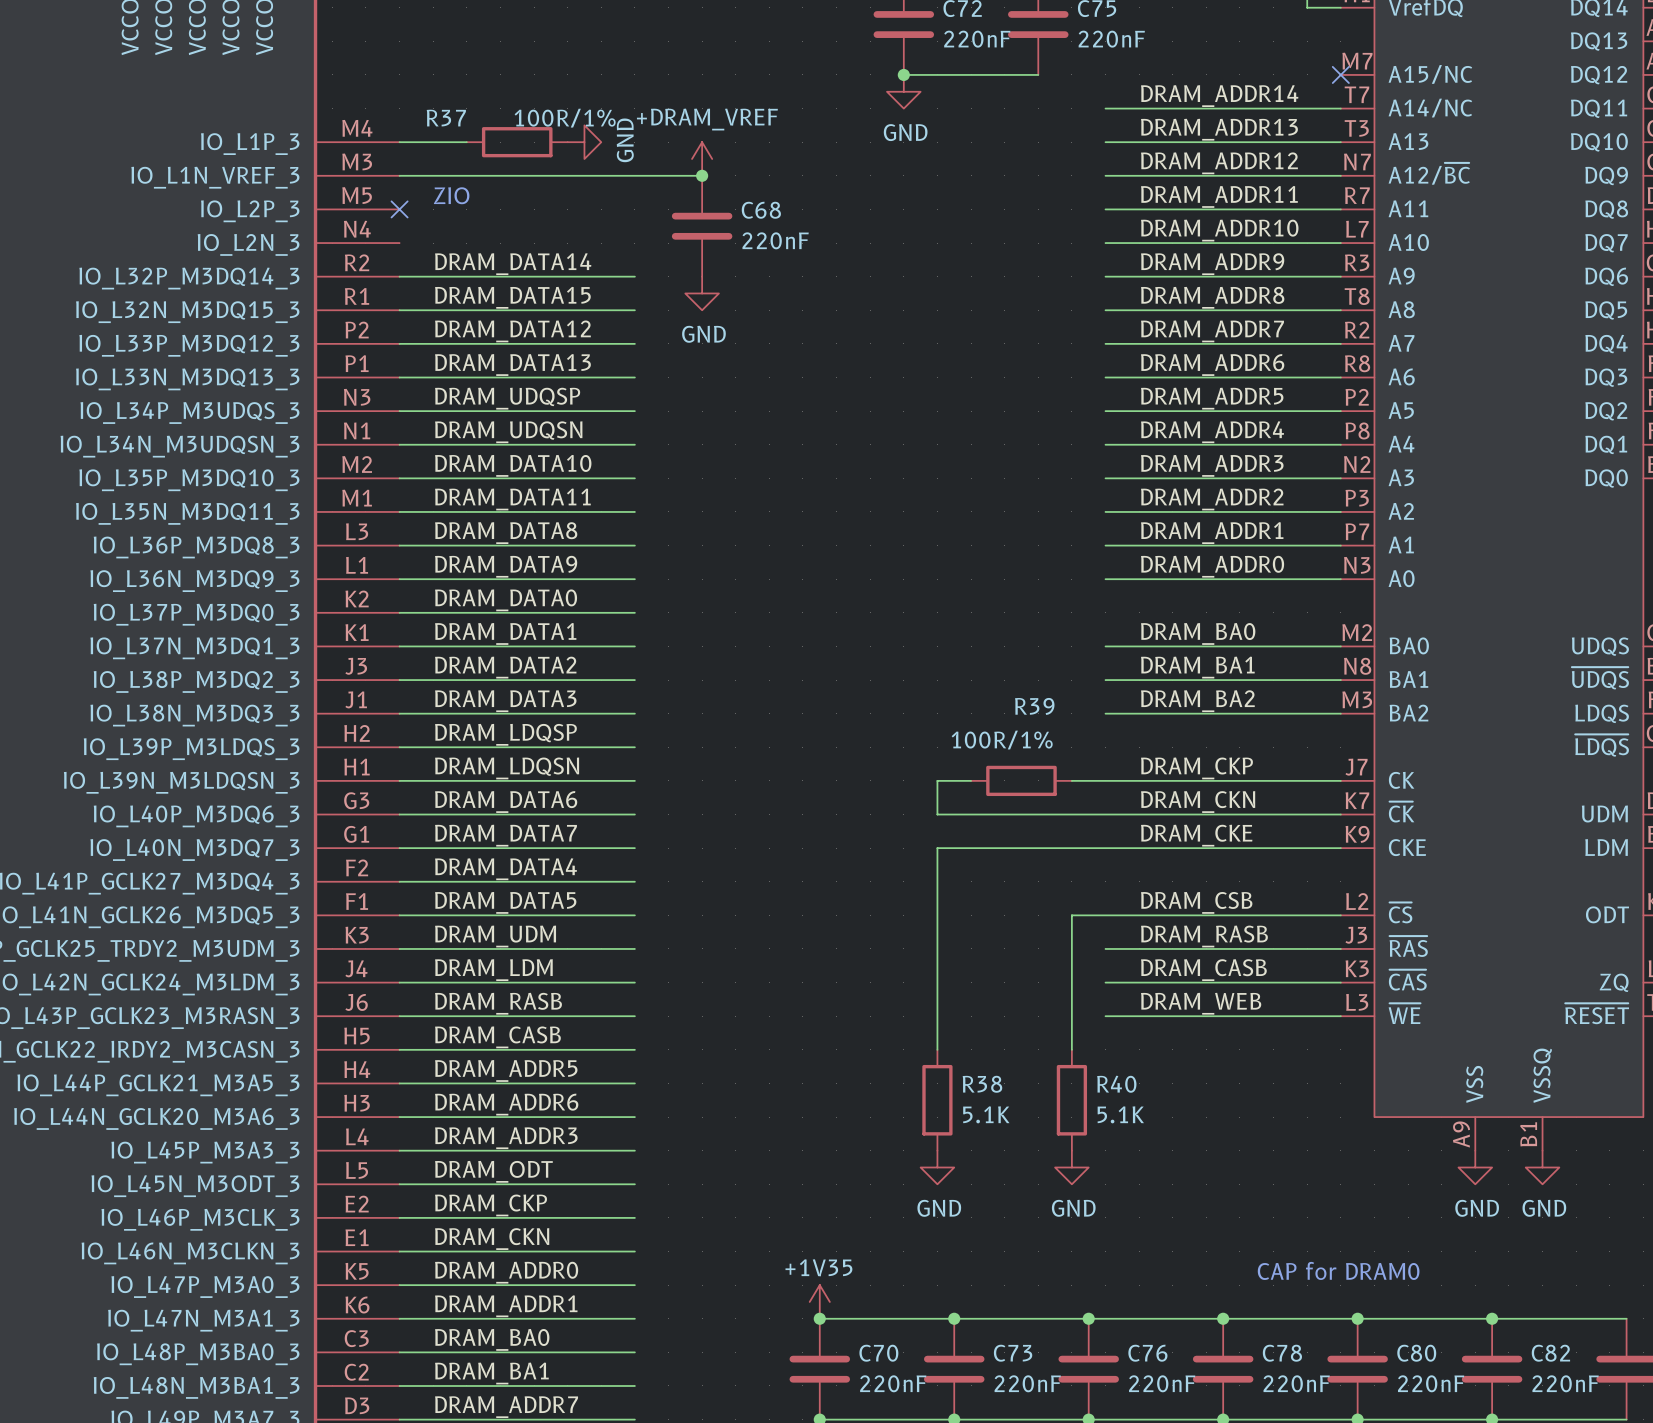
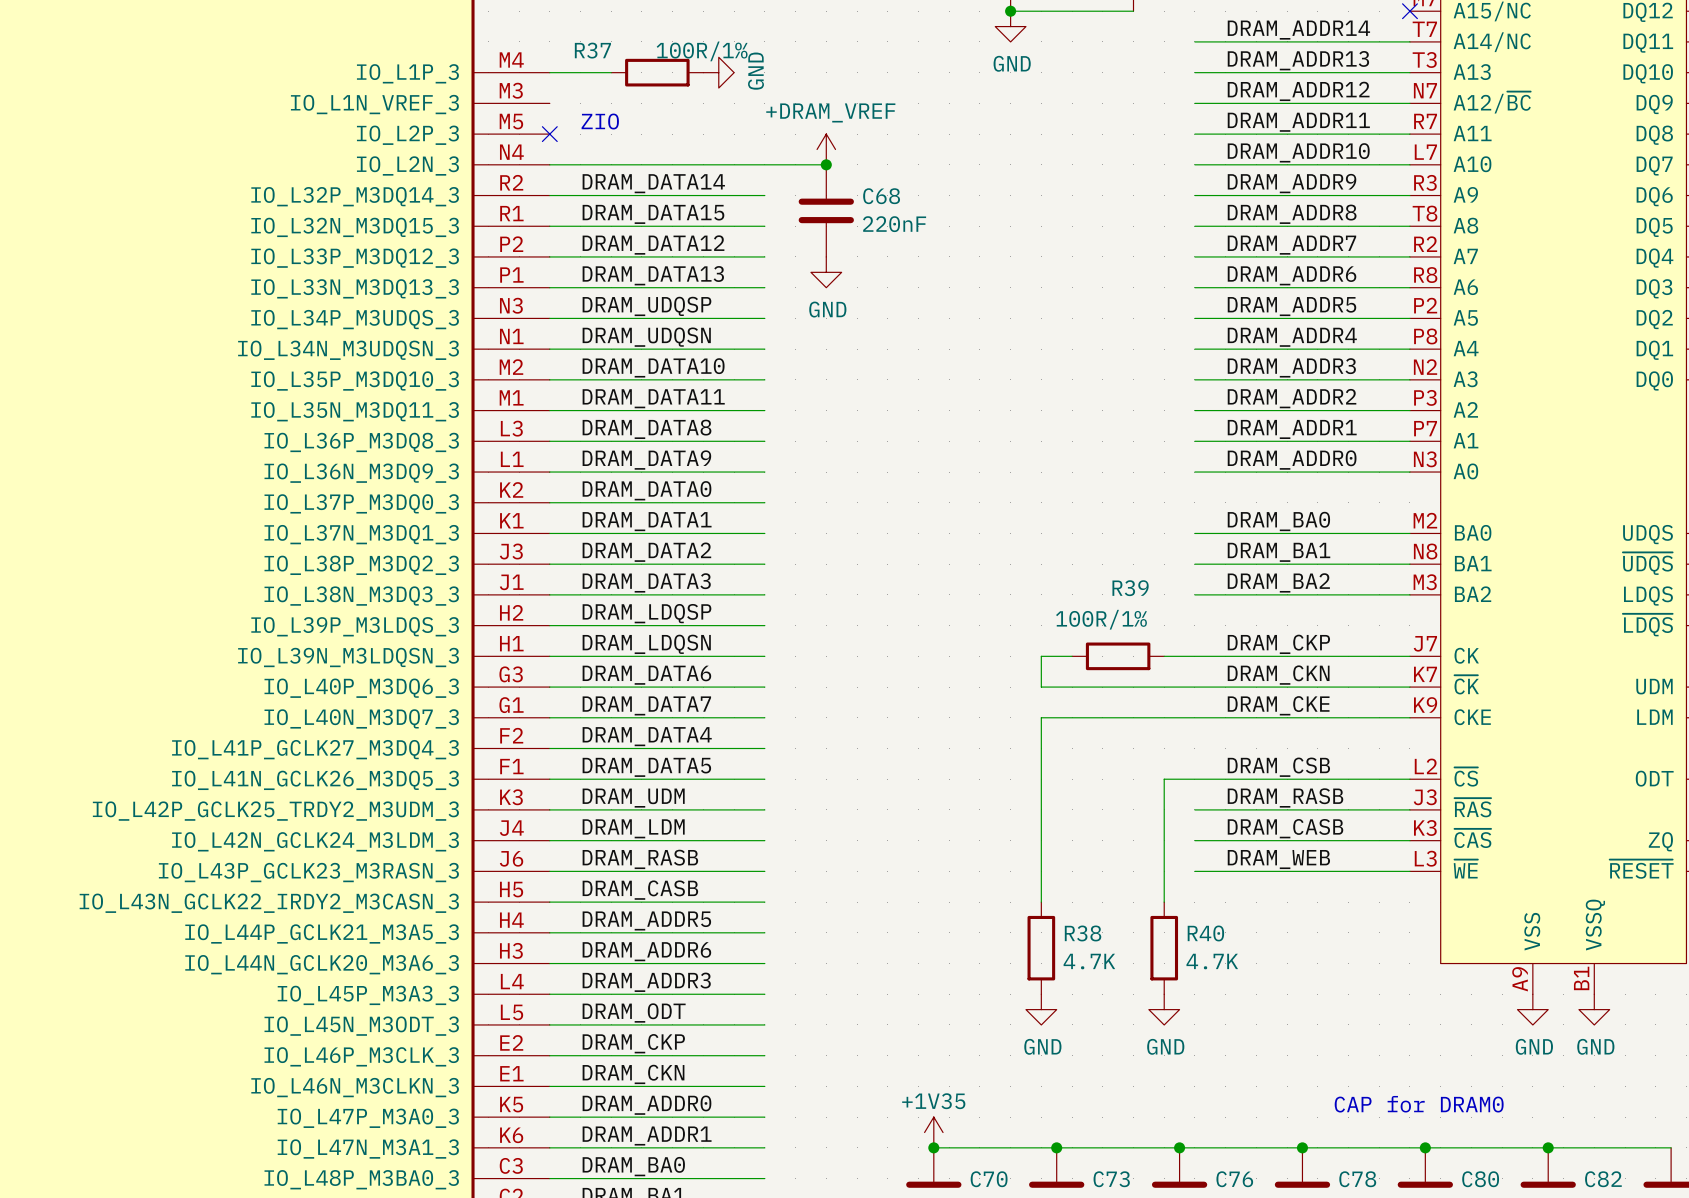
power symbol position: +DRAM_VREF (702, 159) -> +DRAM_VREF (826, 149)
wire: (399, 175) (702, 175) -> (549, 164) (826, 164)
junction position: (702, 175) -> (826, 164)
C68 position: (702, 226) -> (826, 210)
power symbol position: GND (702, 293) -> GND (826, 272)
R38 value: 5.1K (986, 1114) -> 4.7K (1089, 961)
R40 value: 5.1K (1120, 1114) -> 4.7K (1212, 961)

